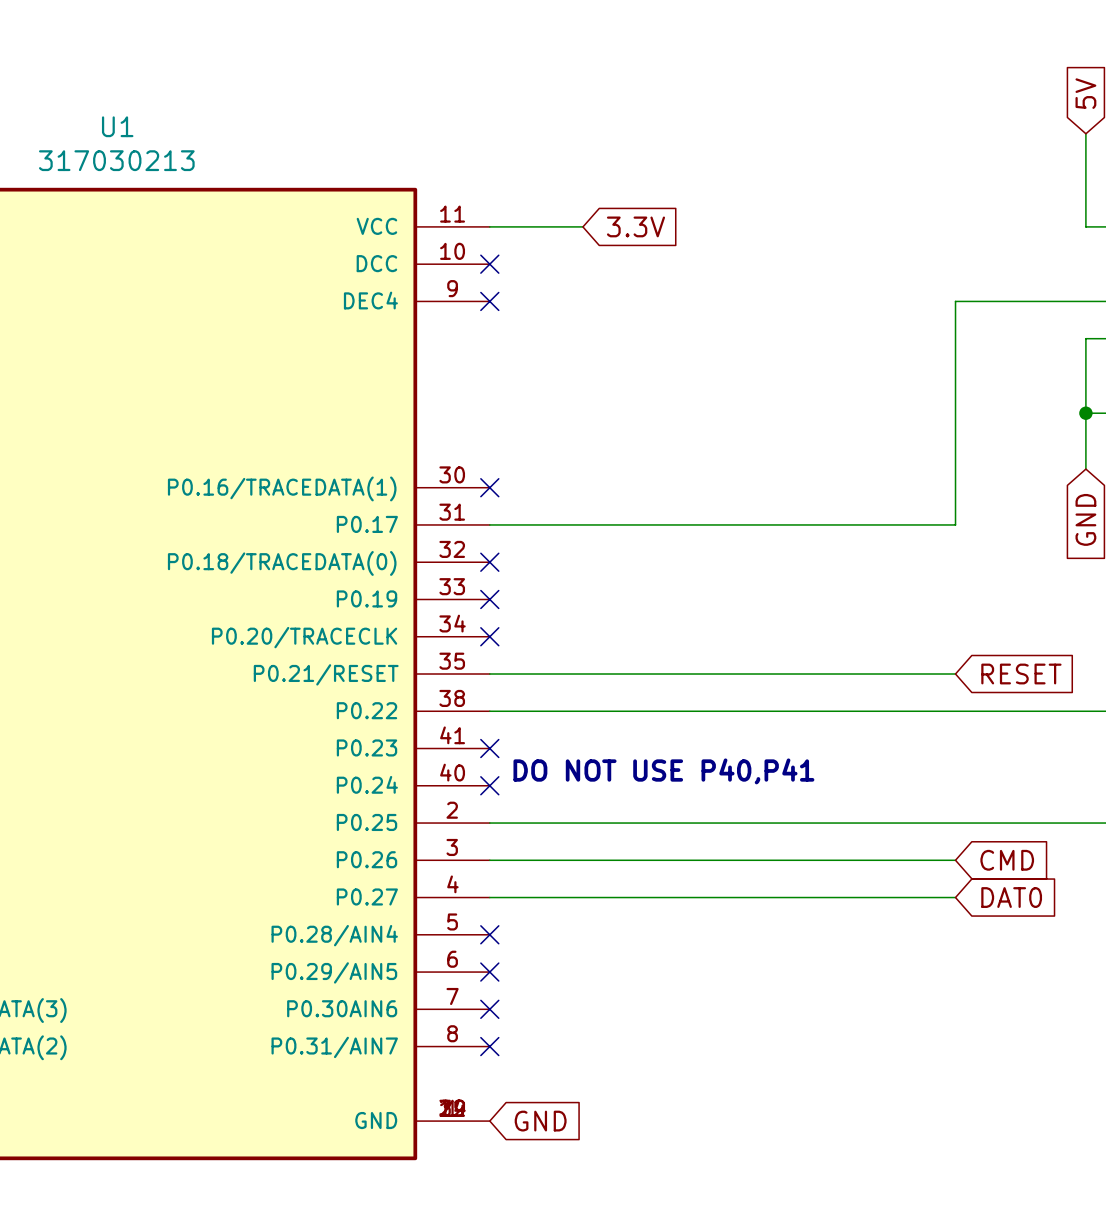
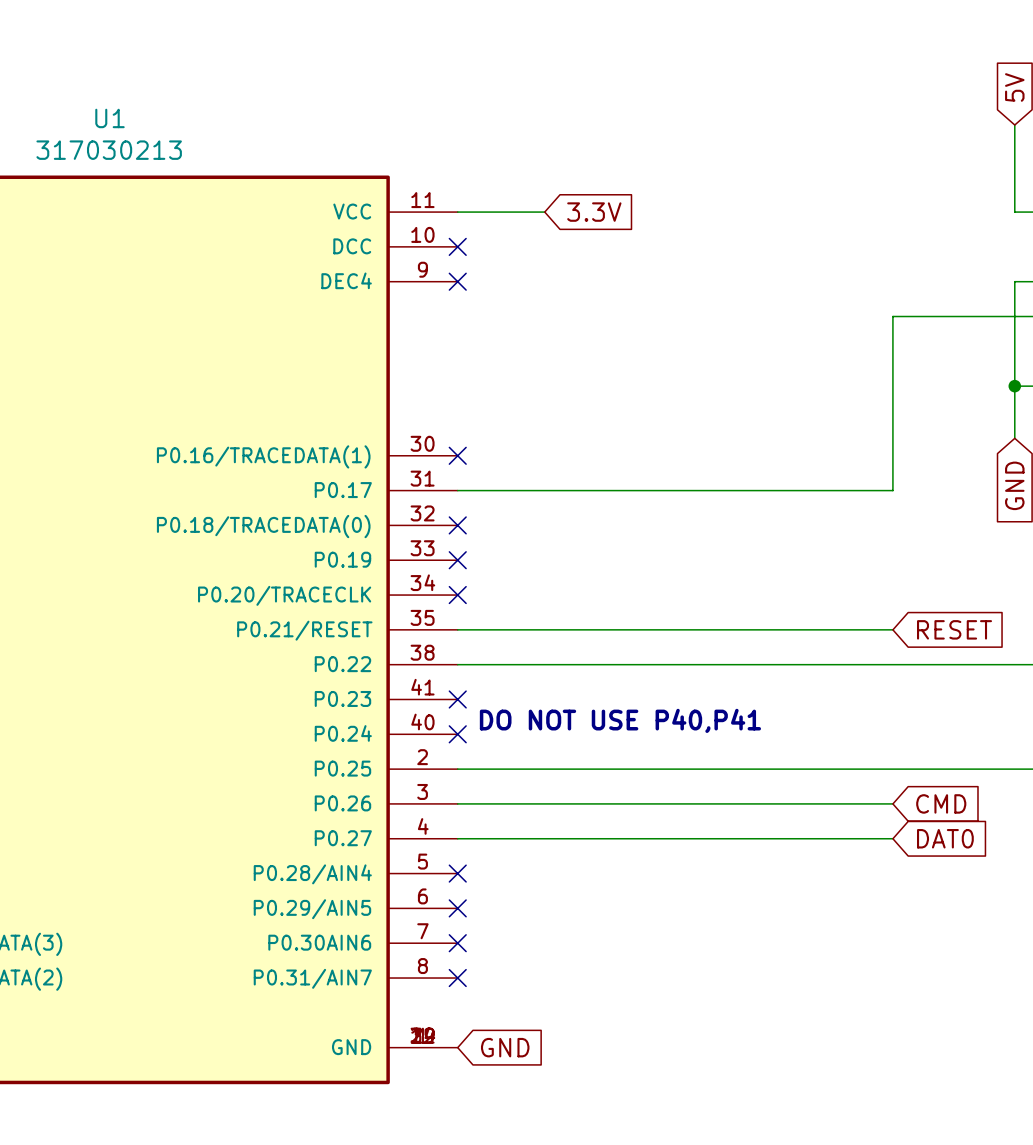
wire: (1085, 301) (955, 301) (955, 338) -> (1014, 281) (1014, 316) (892, 316)

